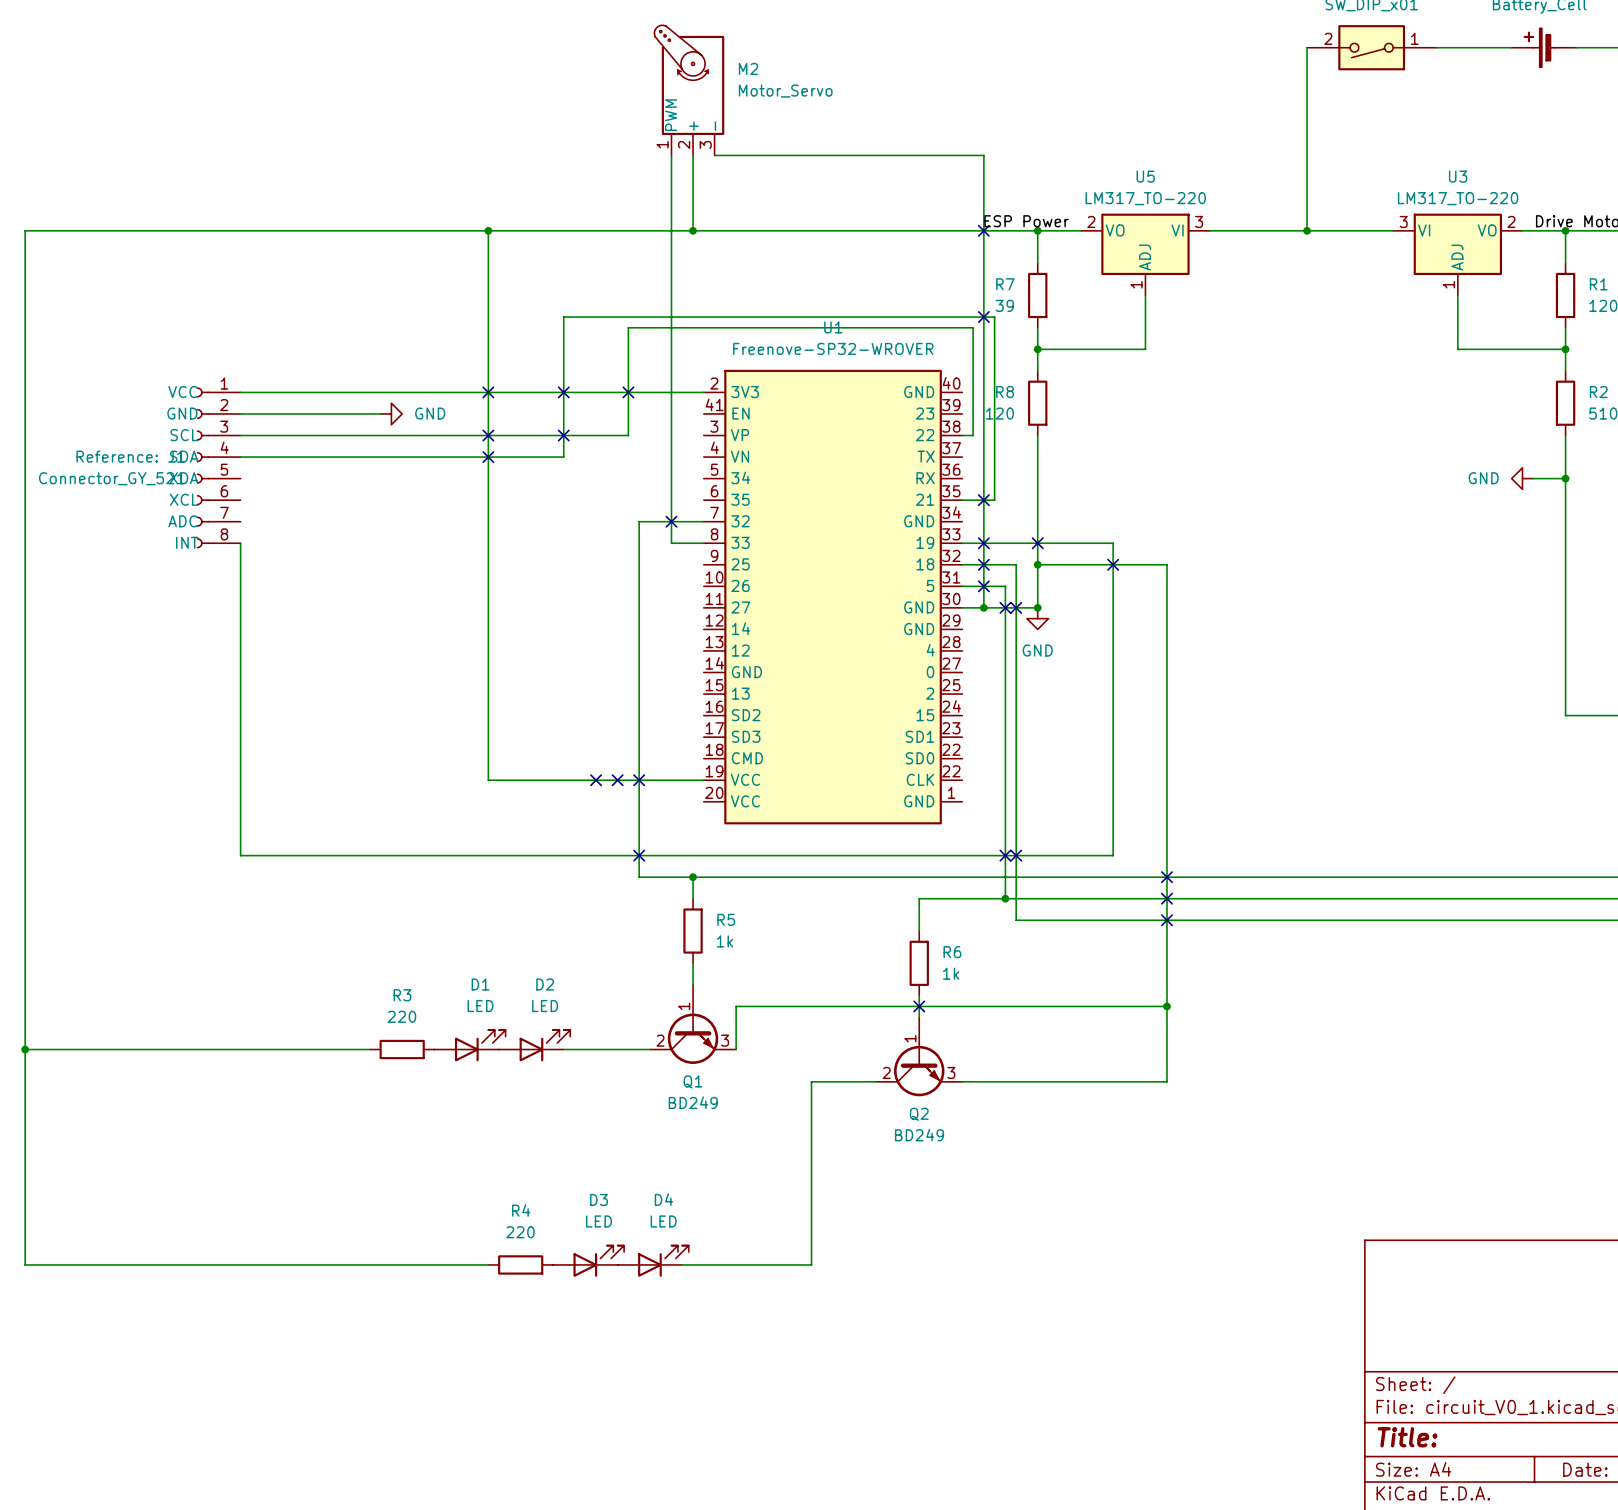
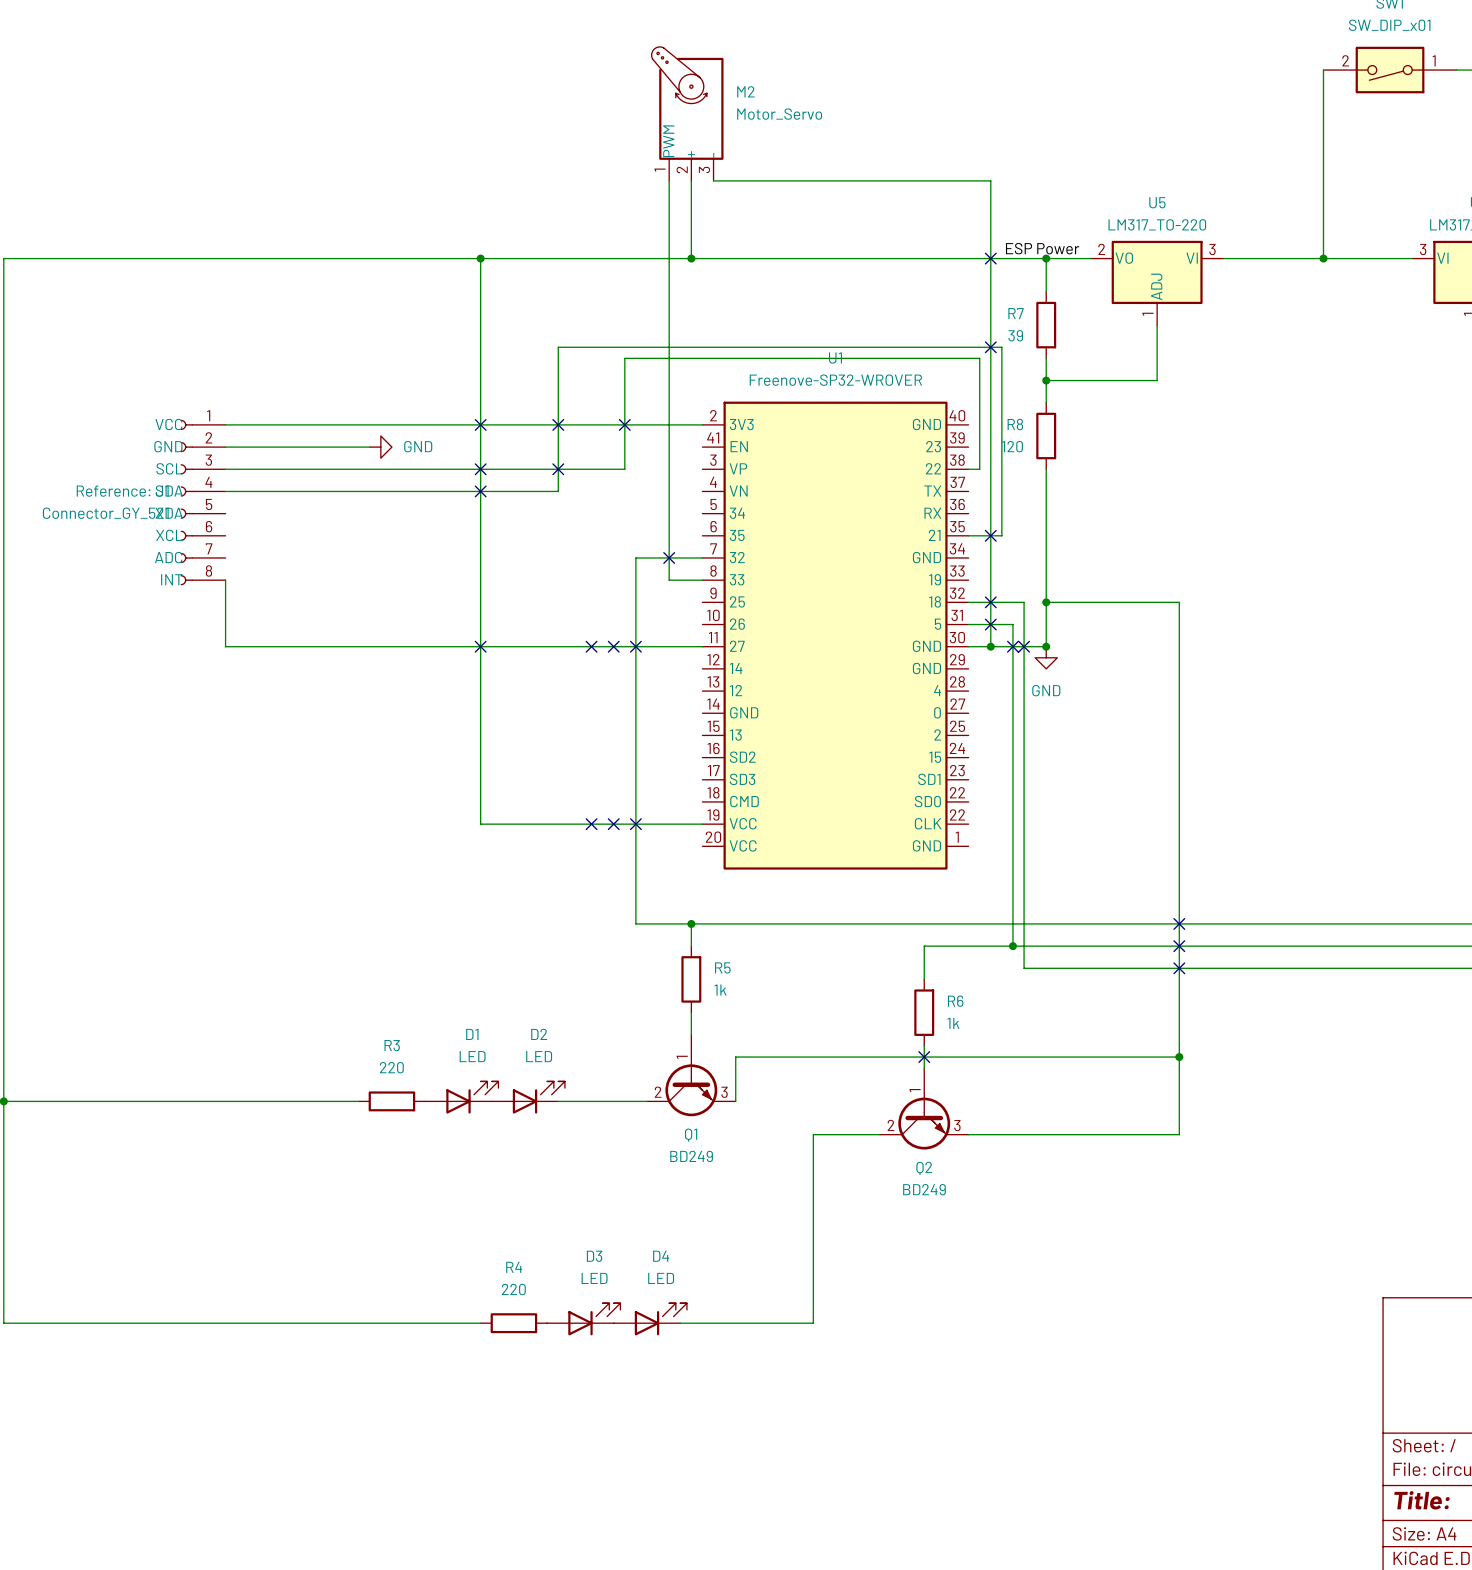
wire: (962, 543) (1113, 543) (1113, 855) (240, 855) (240, 607) -> (702, 646) (225, 646)
no-connect mark: (983, 543) -> none
no-connect mark: (1037, 543) -> none
no-connect mark: (1113, 564) -> none
no-connect mark: none -> (480, 646)
no-connect mark: none -> (591, 646)
no-connect mark: none -> (613, 646)
no-connect mark: none -> (635, 646)
no-connect mark: (639, 855) -> none
no-connect mark: (1005, 855) -> none
no-connect mark: (1016, 855) -> none

